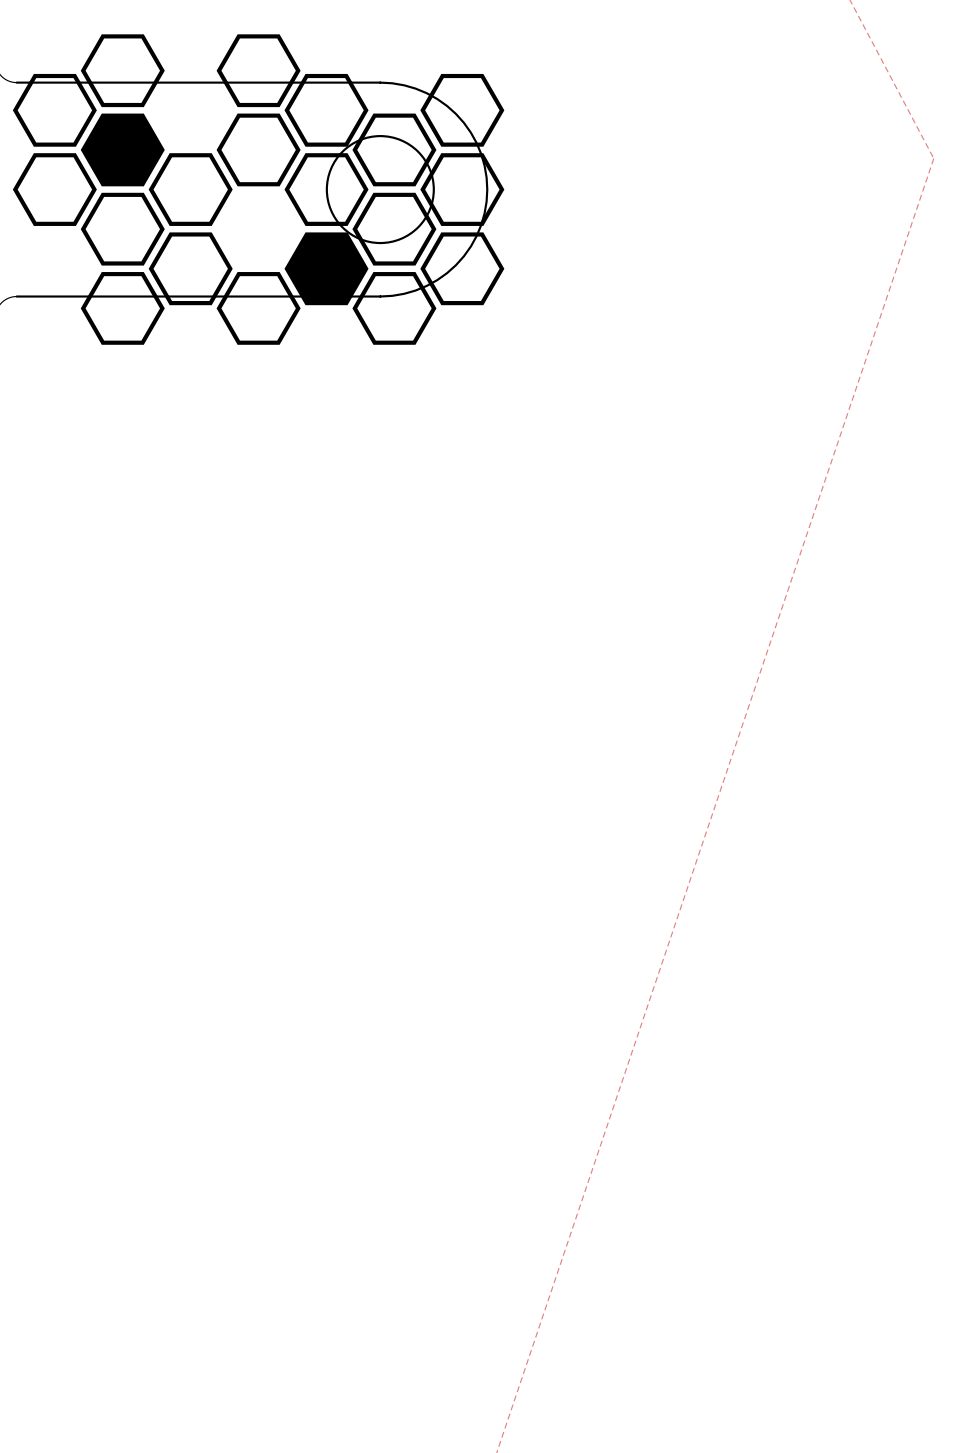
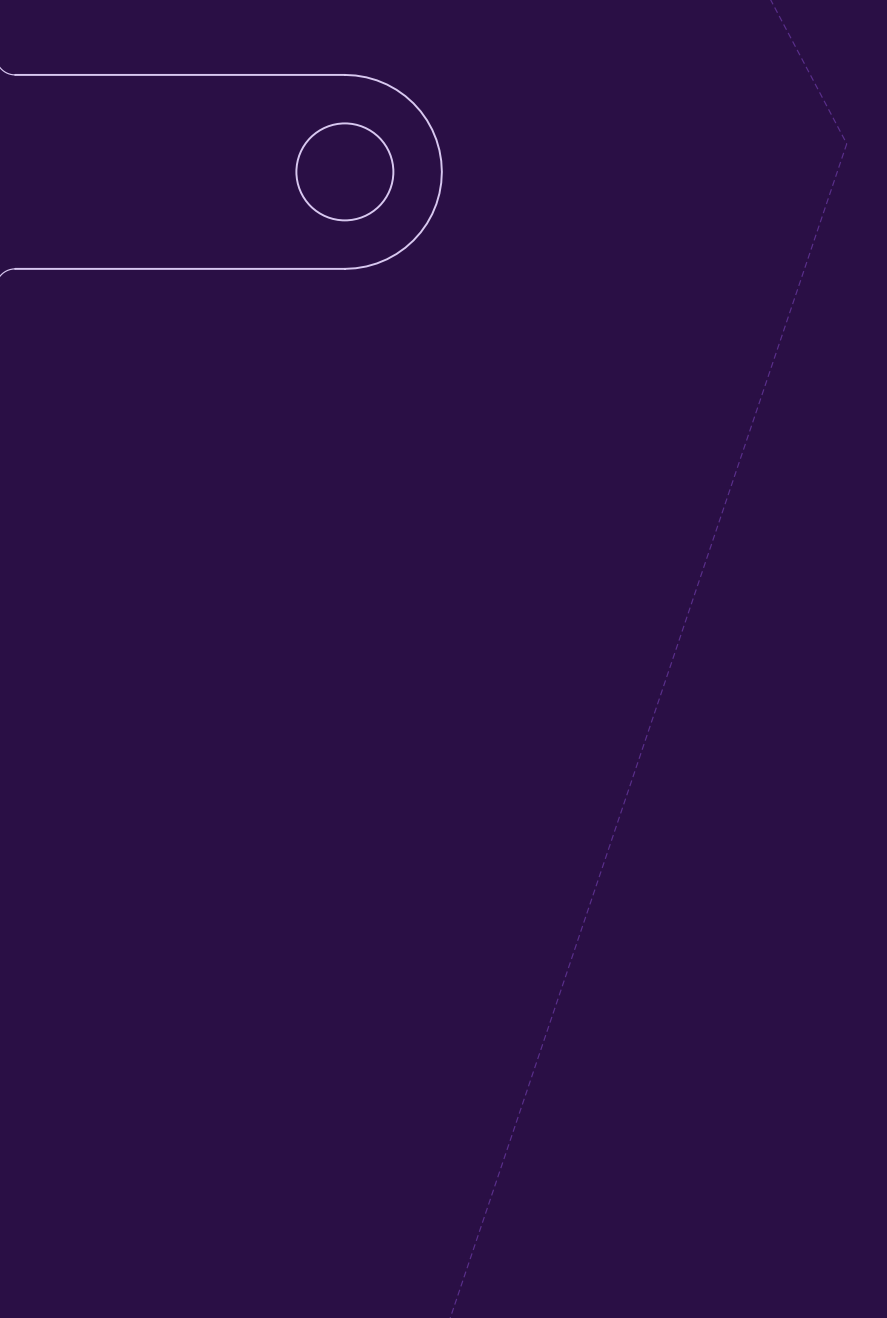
drawing: [12, 34, 505, 345] -> none

